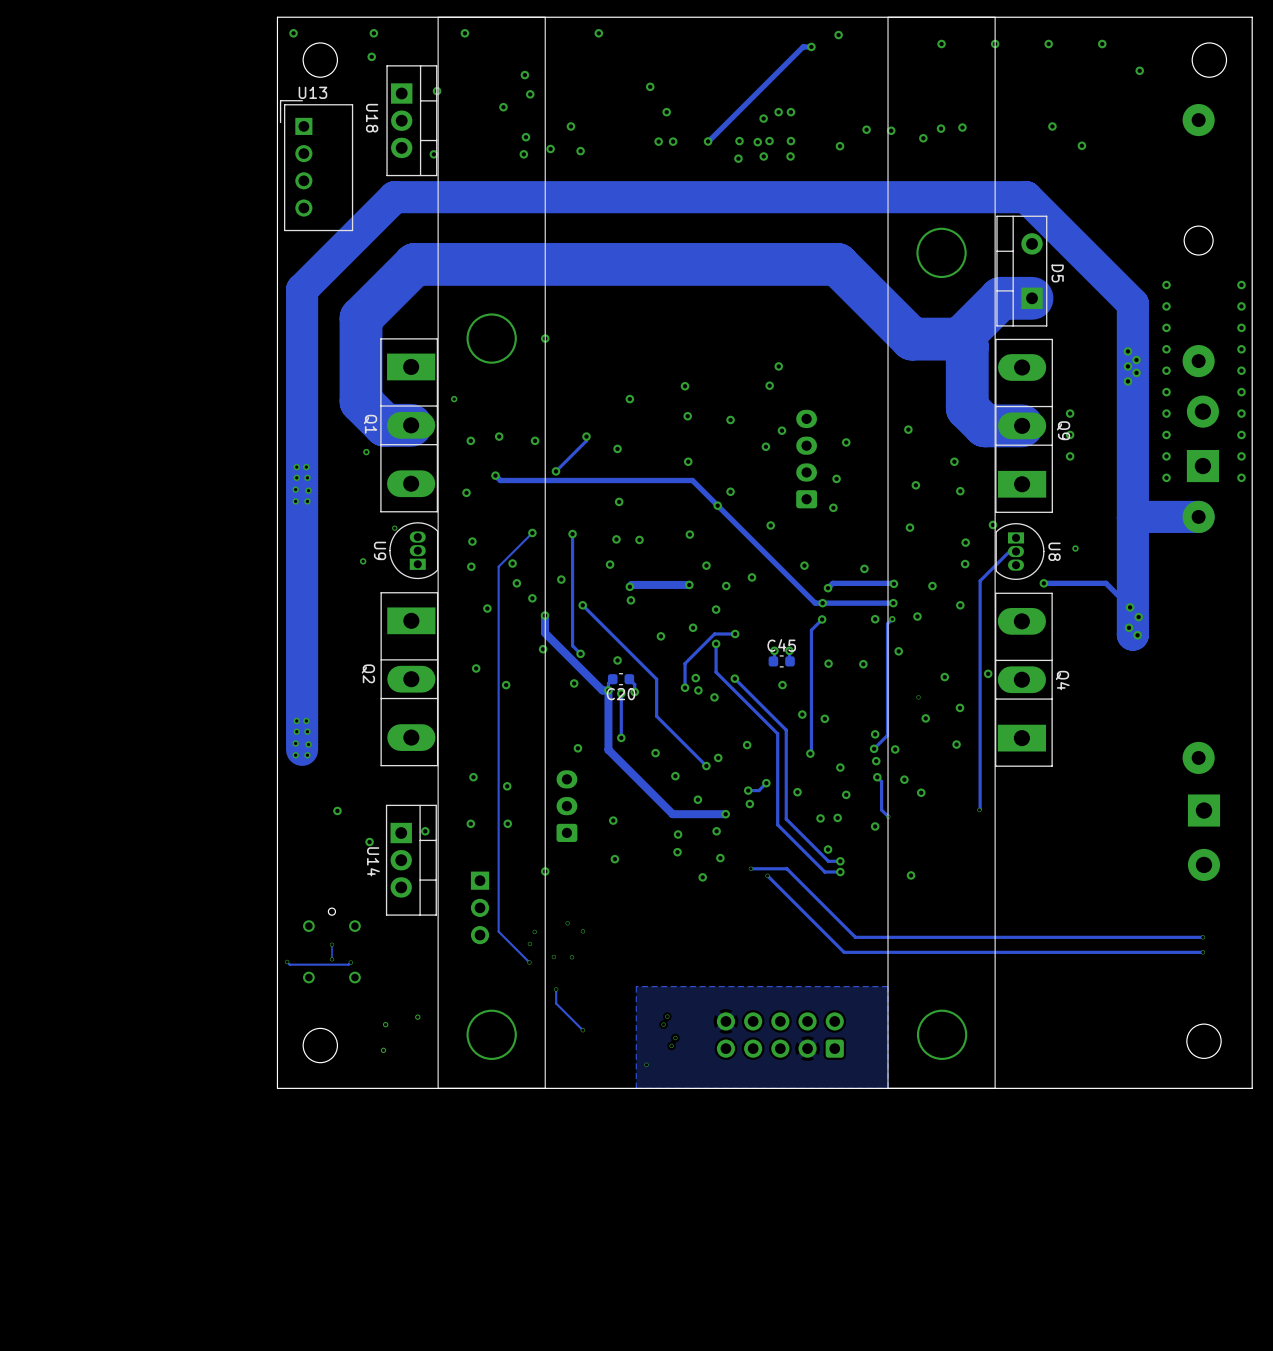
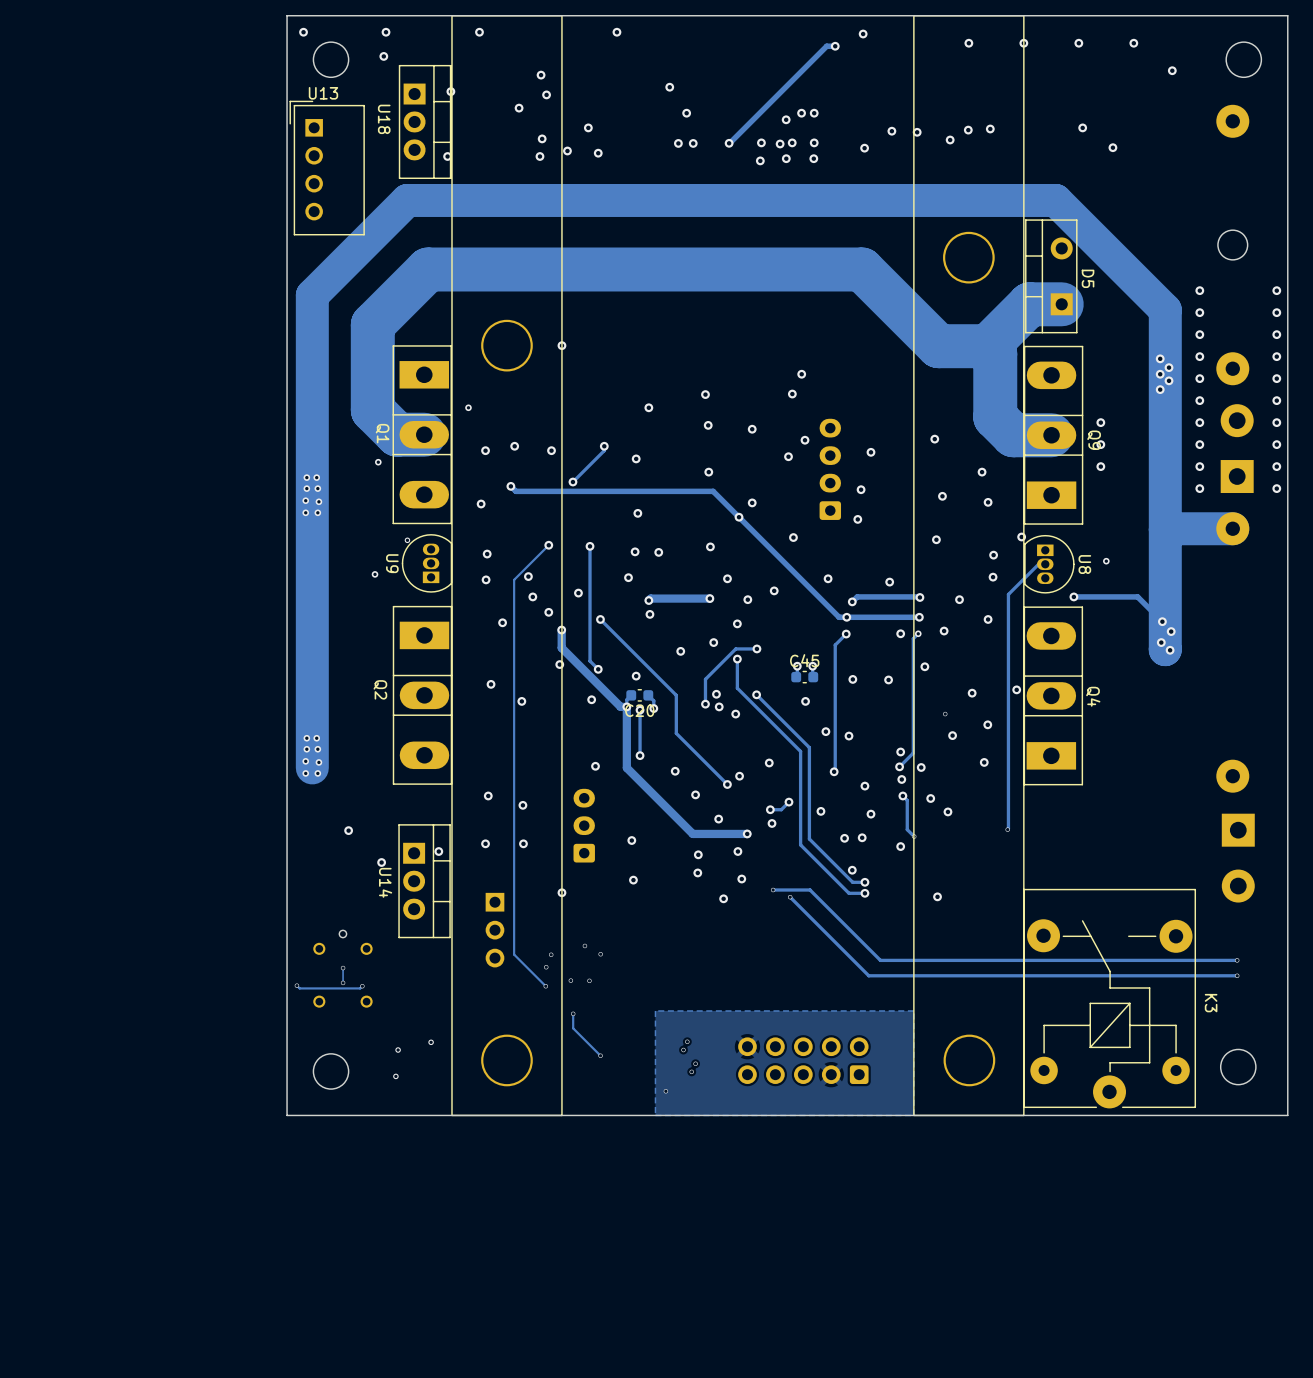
K3: none -> (1109, 998)

